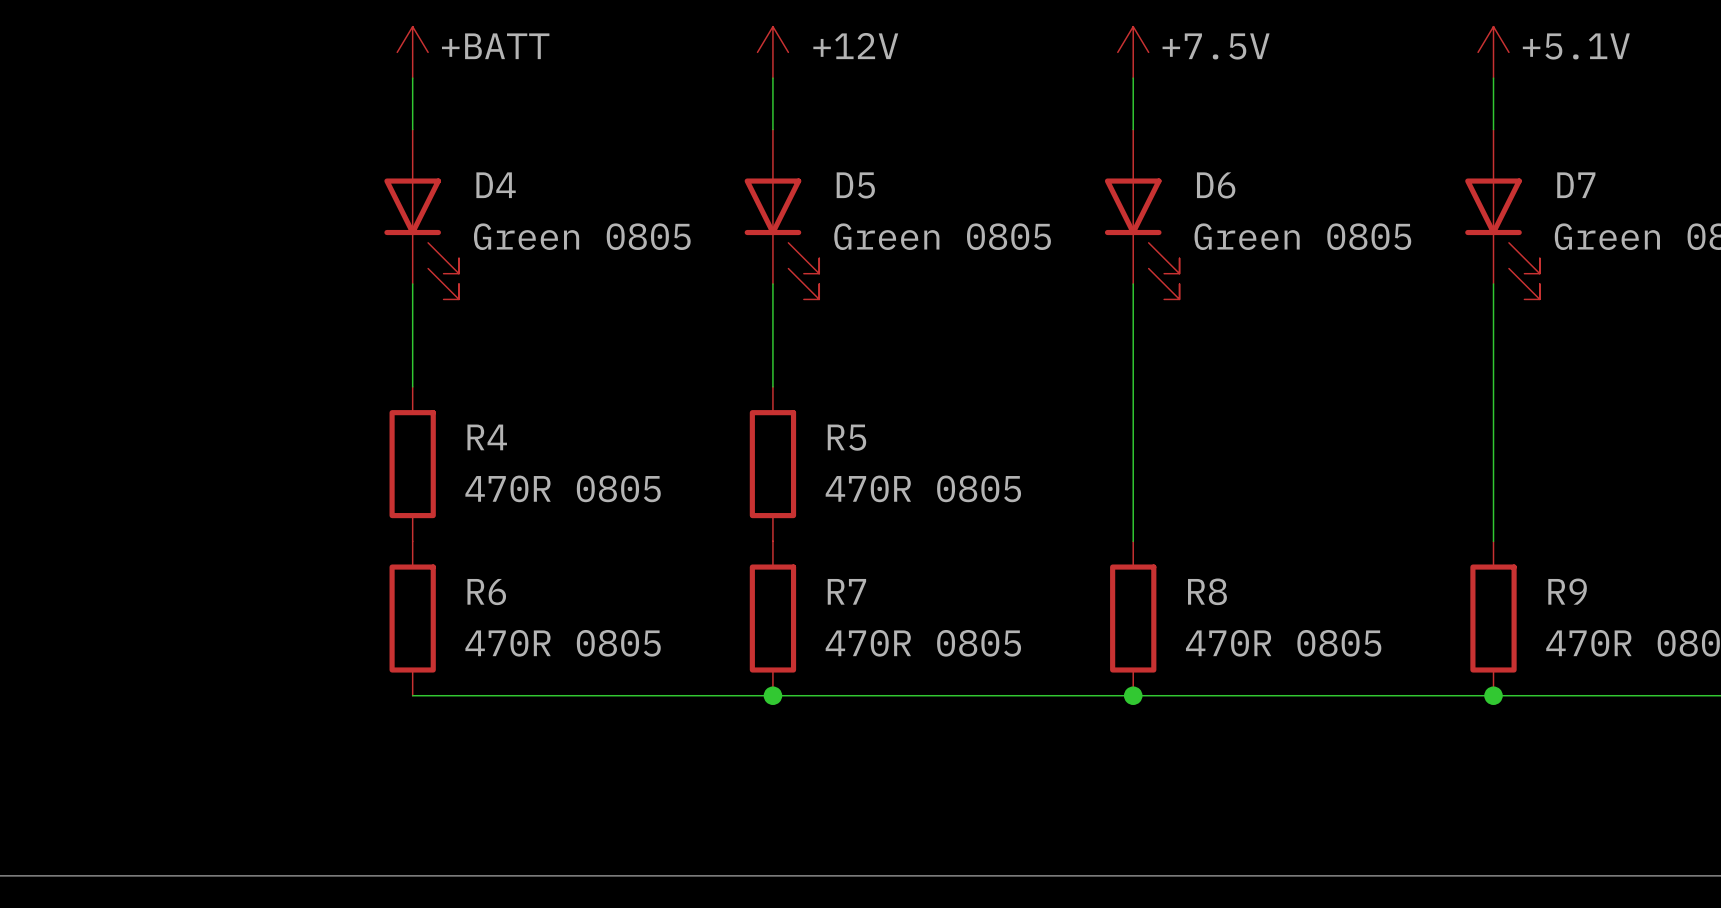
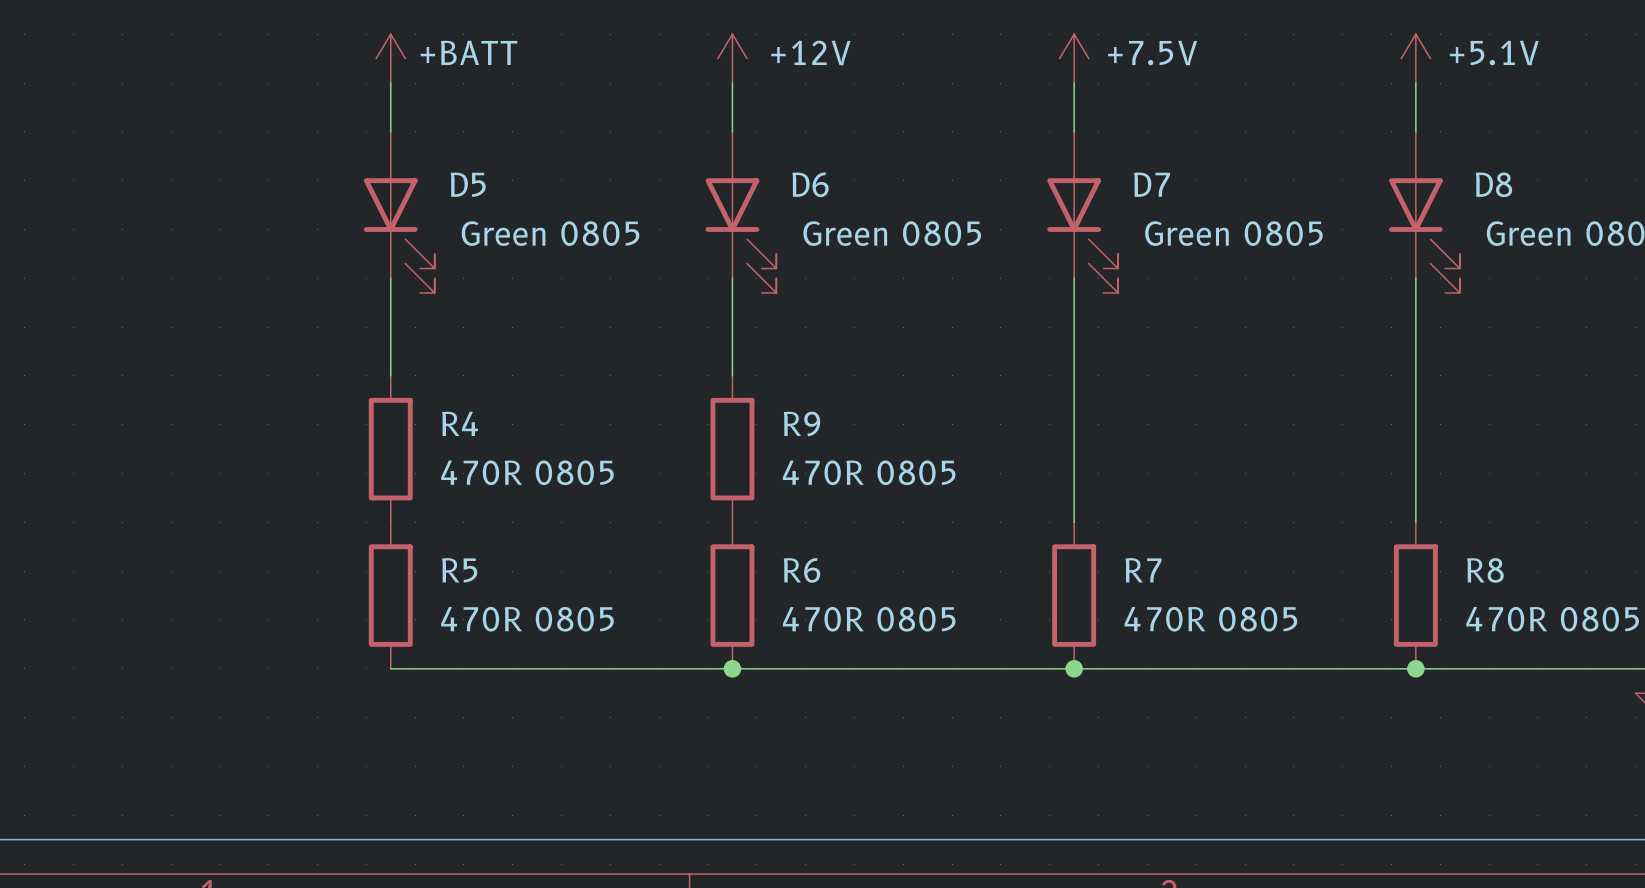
D4 name: D4 (496, 185) -> D5 (468, 184)
D5 name: D5 (855, 185) -> D6 (810, 184)
D6 name: D6 (1216, 185) -> D7 (1152, 184)
D7 name: D7 (1576, 185) -> D8 (1493, 184)
R5 name: R5 (846, 437) -> R9 (801, 423)
R7 name: R7 (846, 591) -> R6 (801, 570)
R8 name: R8 (1207, 591) -> R7 (1143, 570)
R9 name: R9 (1567, 591) -> R8 (1485, 570)
R6 name: R6 (486, 592) -> R5 (459, 570)

